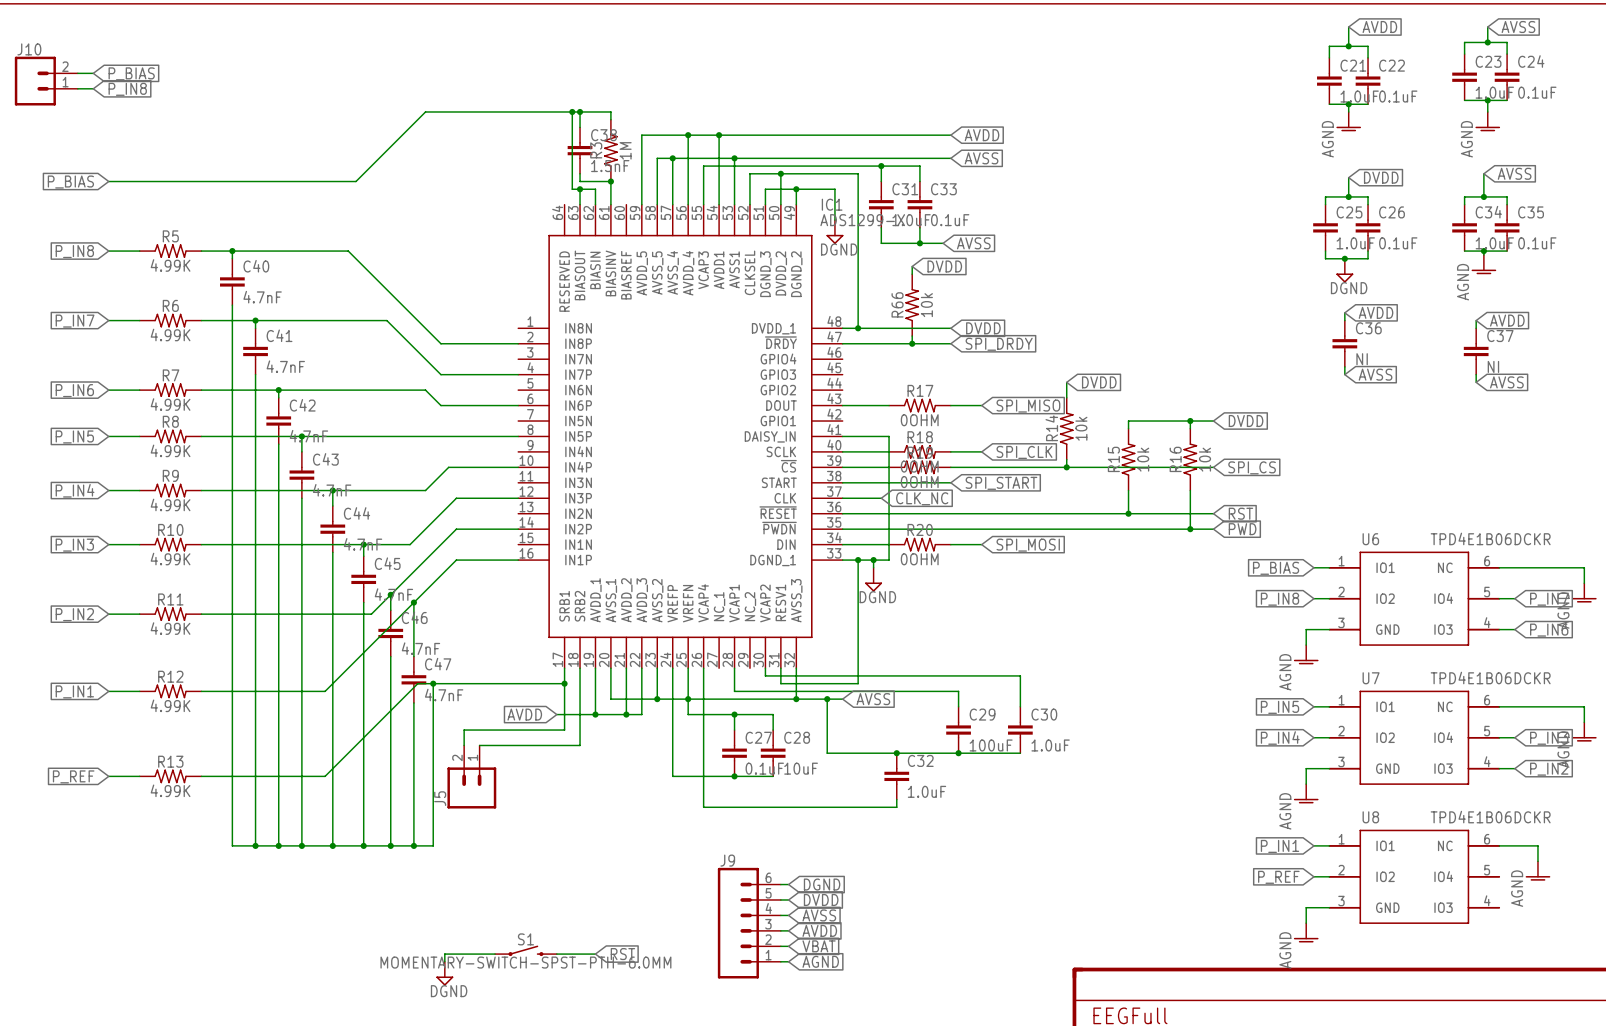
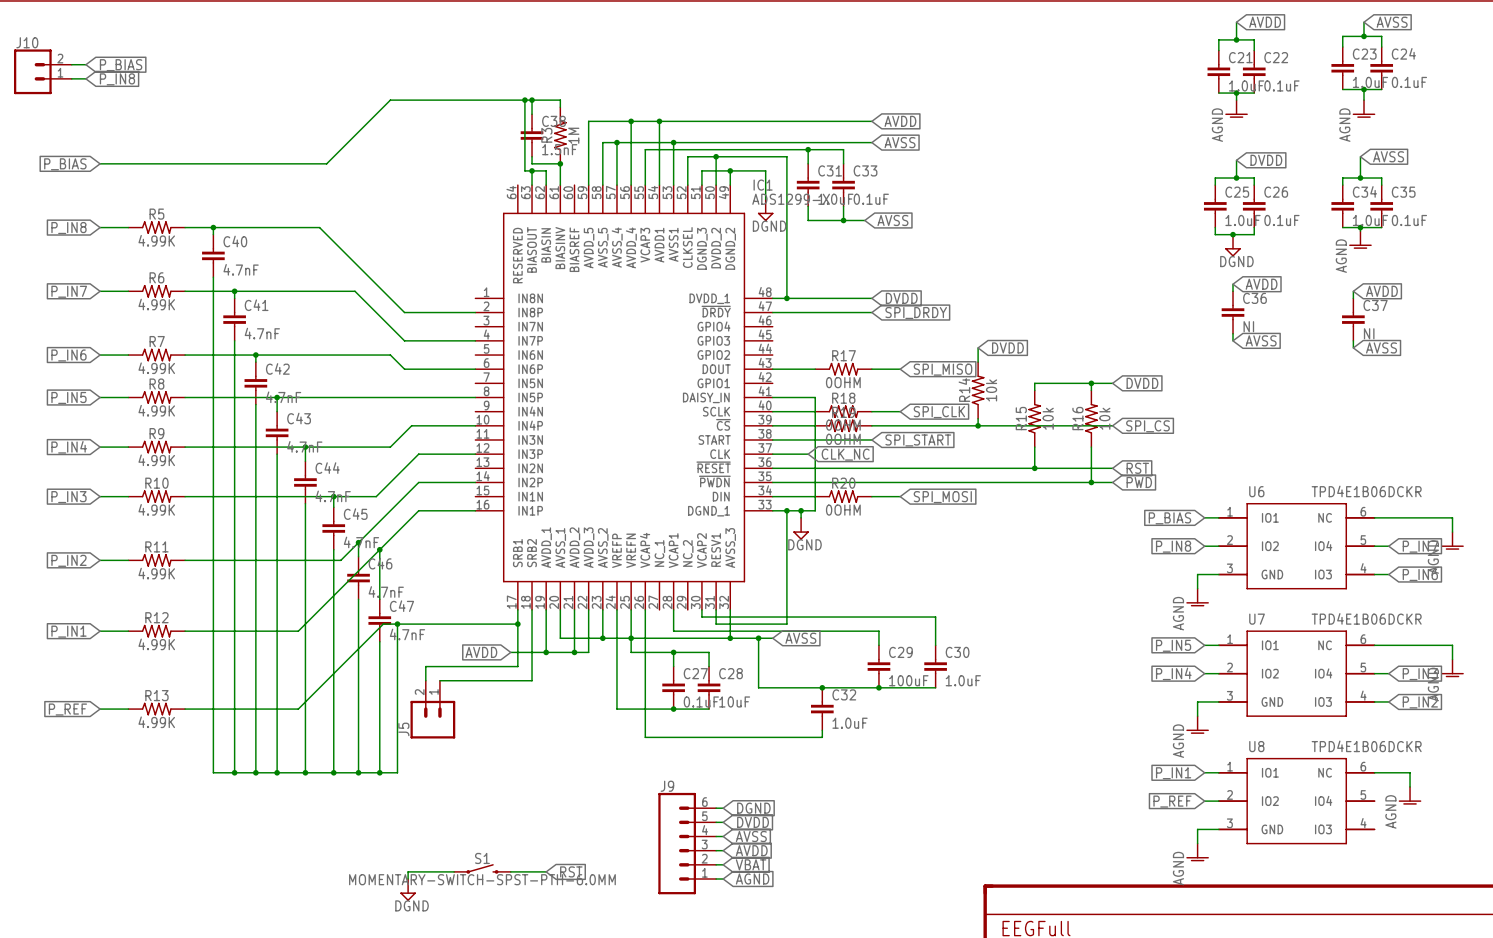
wire: (912, 266) (912, 274) -> none
global label: DVDD (944, 266) -> none
R66: 10k (912, 305) -> none
wire: (912, 336) (912, 343) -> none
junction: (912, 343) -> none

